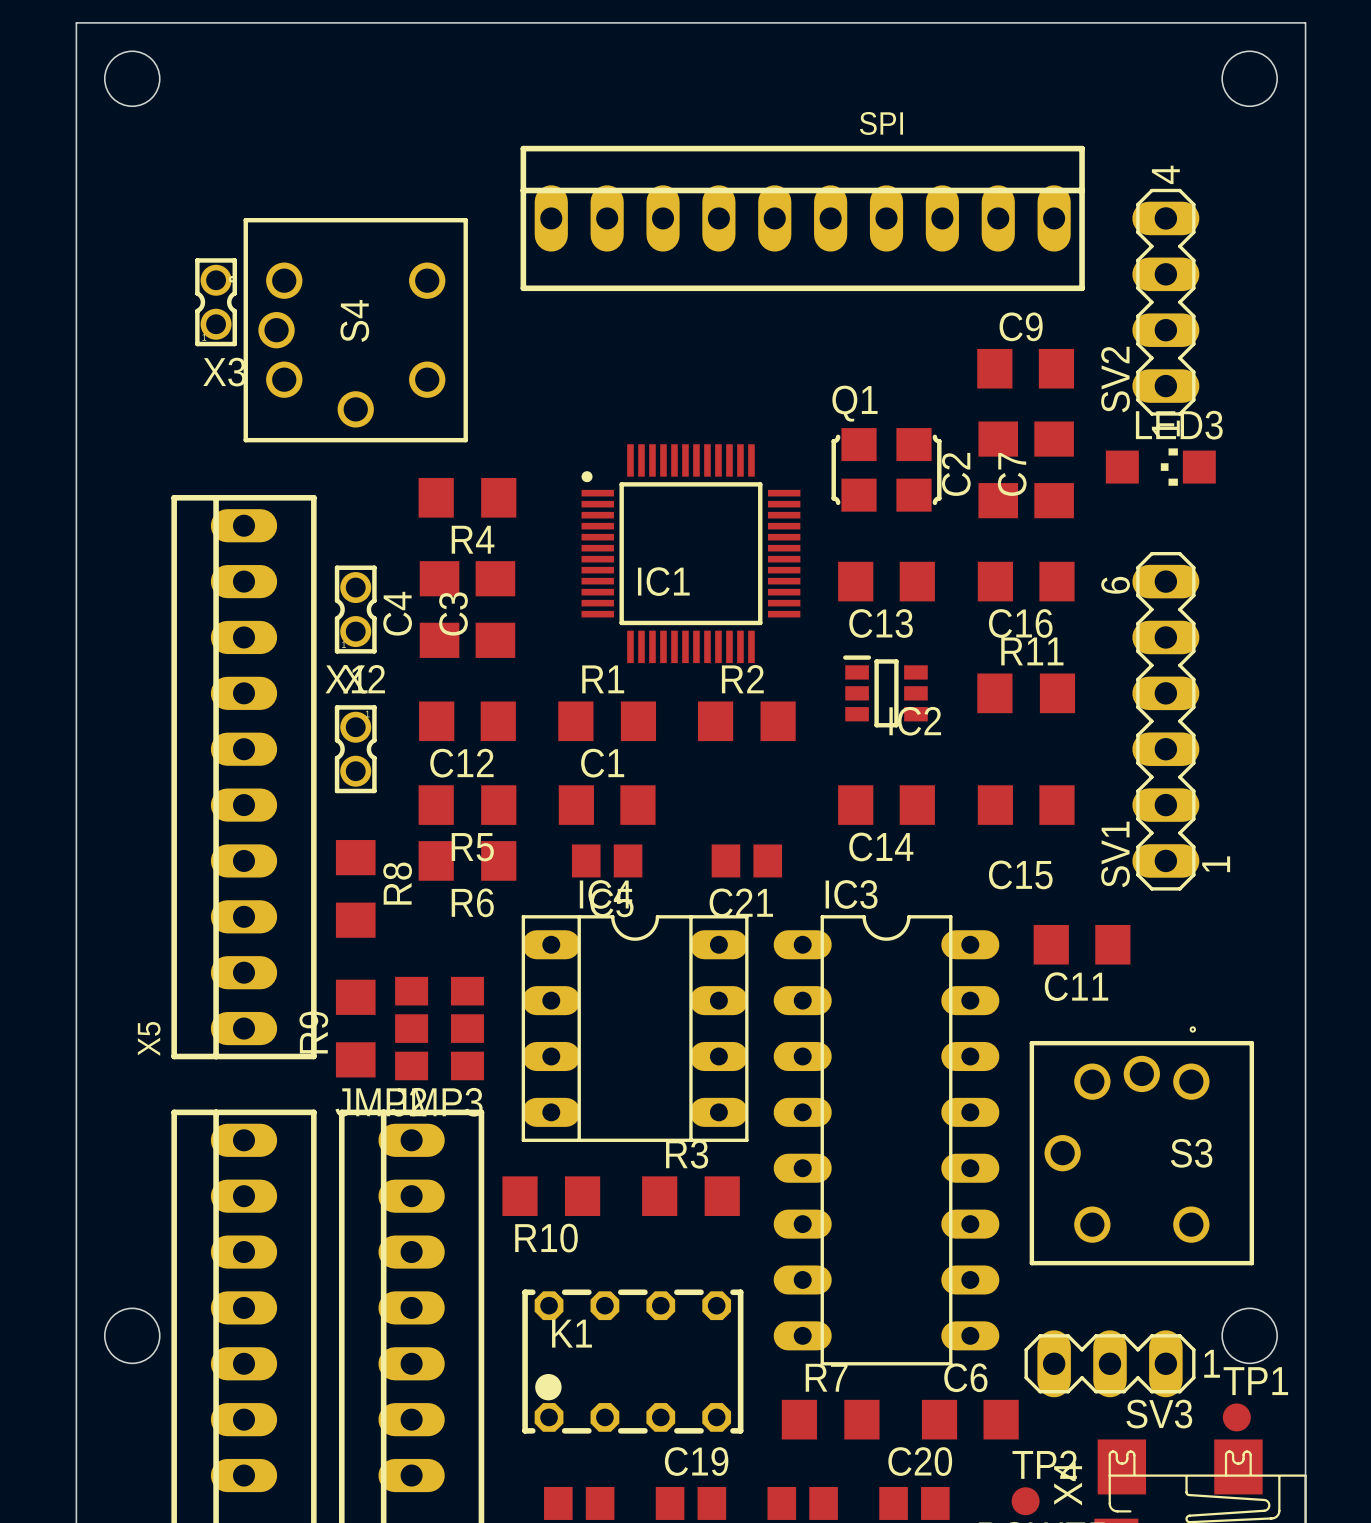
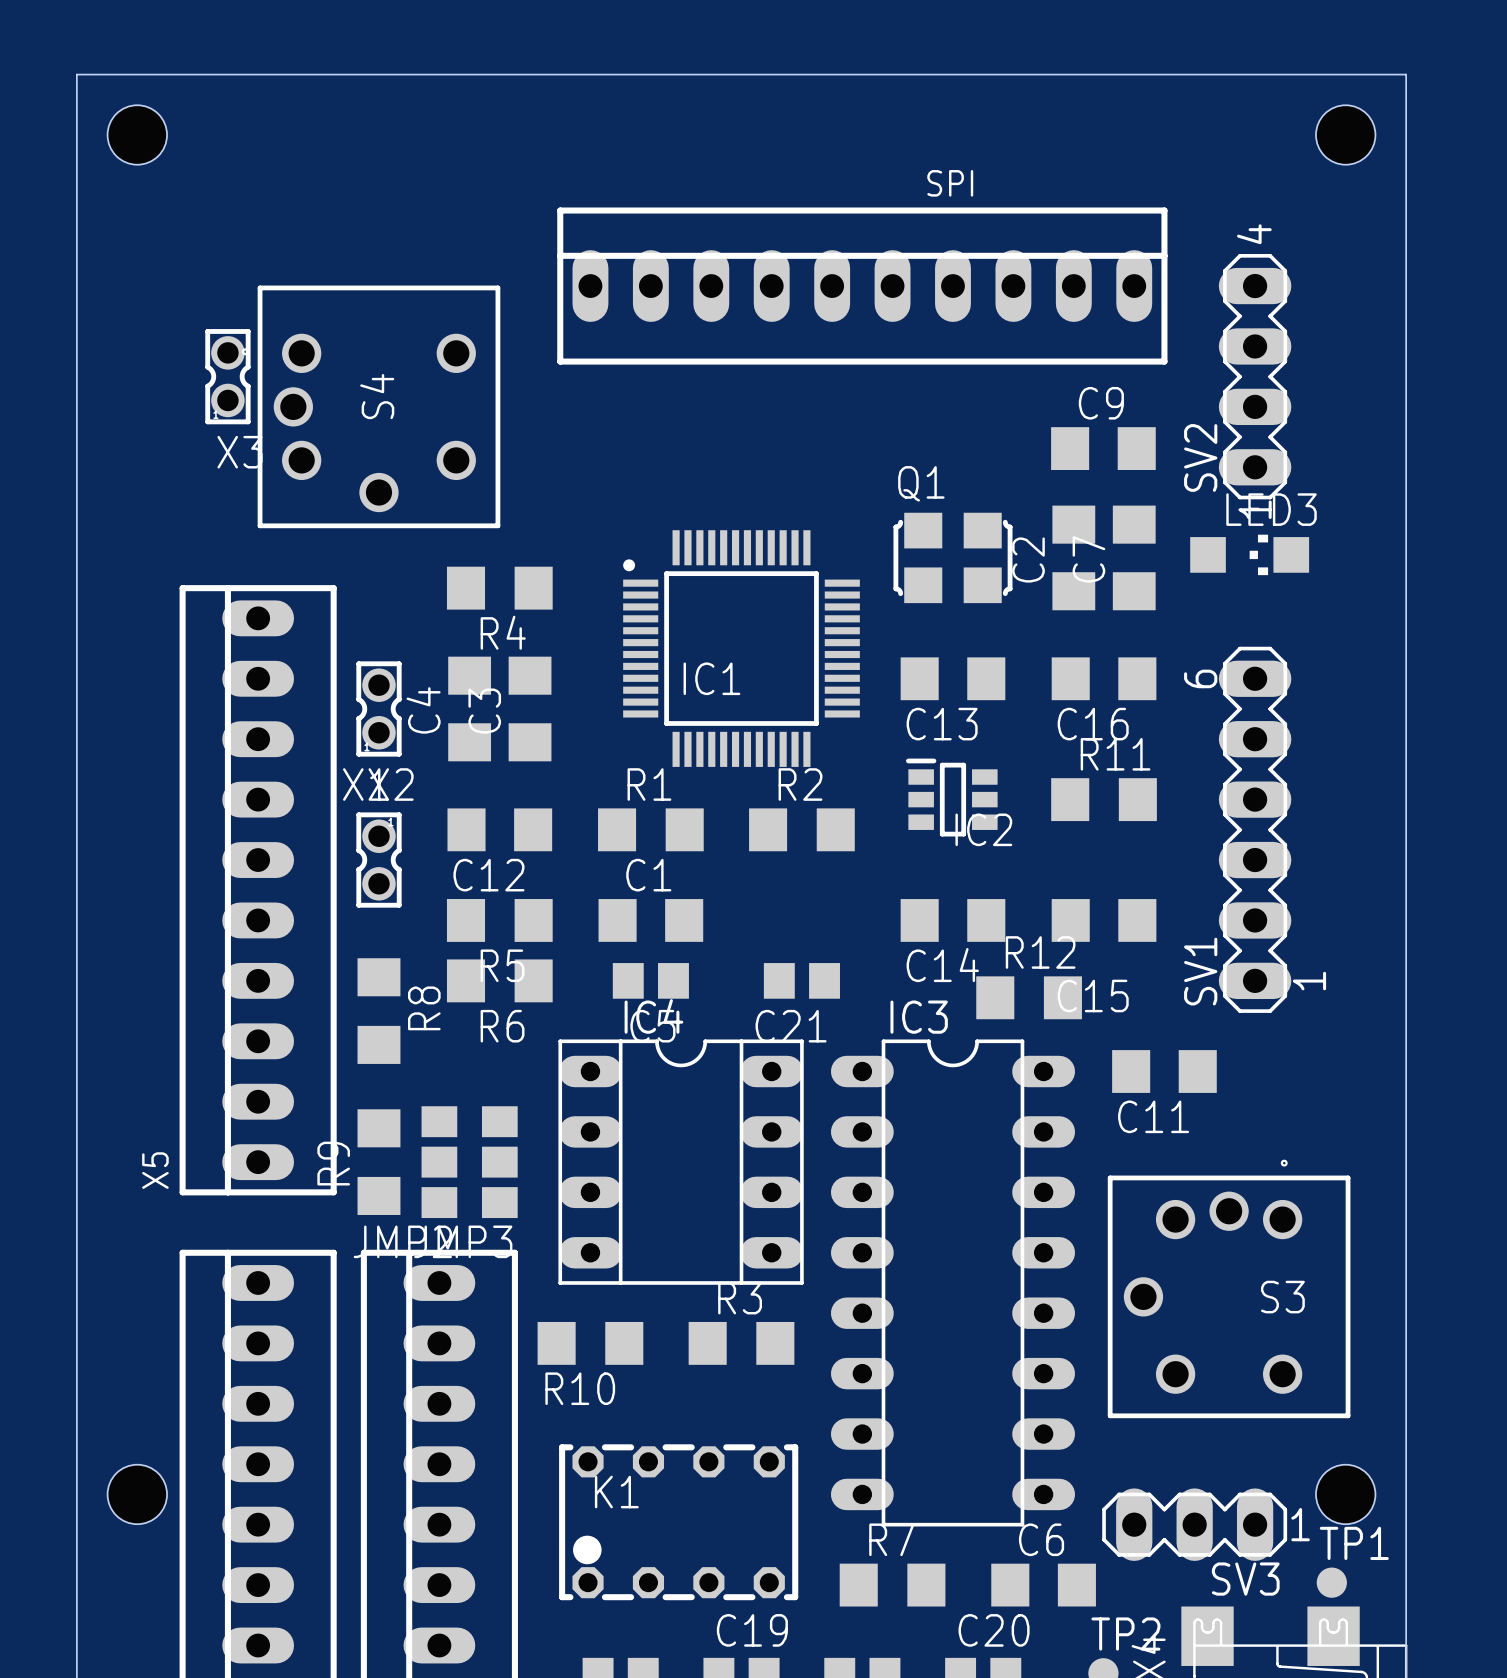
R12: none -> (1029, 997)

